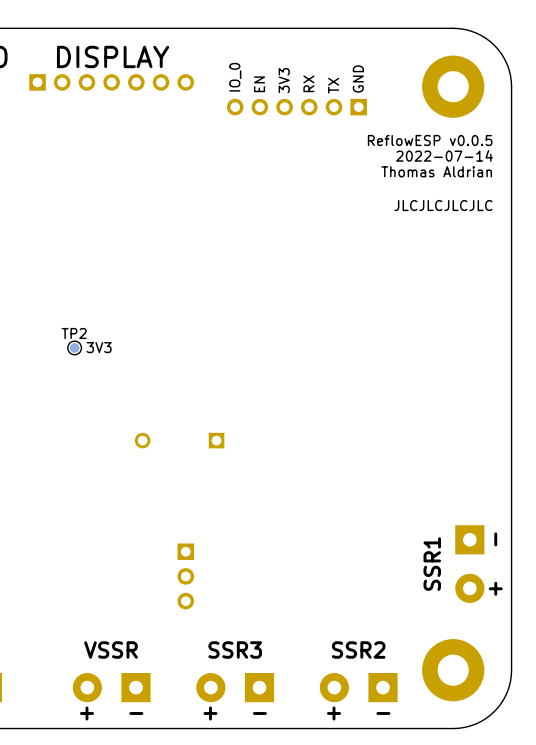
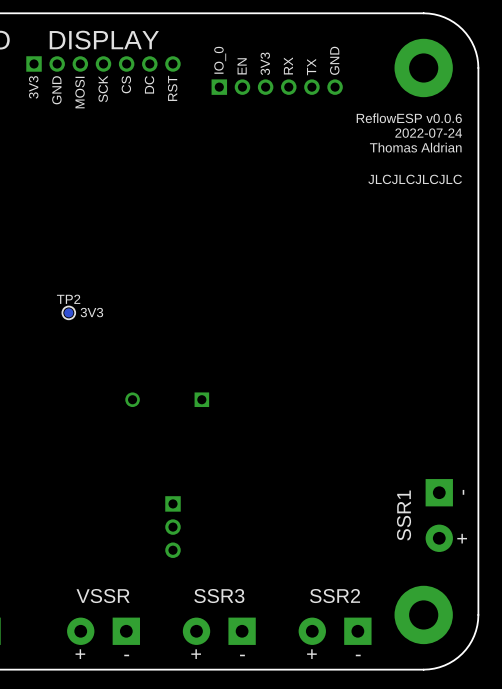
text: none -> CS (126, 84)
text: none -> DC (149, 84)
part rotation: 0° (296, 107) -> 180° (277, 87)
text: none -> RST (172, 88)
text: none -> 3V3 (33, 87)
text: none -> GND (56, 90)
text: none -> SCK (103, 88)
text: none -> MOSI (80, 92)
text: ReflowESP v0.0.5 (430, 140) -> ReflowESP v0.0.6 (409, 118)
text: 2022-07-14 (444, 155) -> 2022-07-24 (428, 133)

